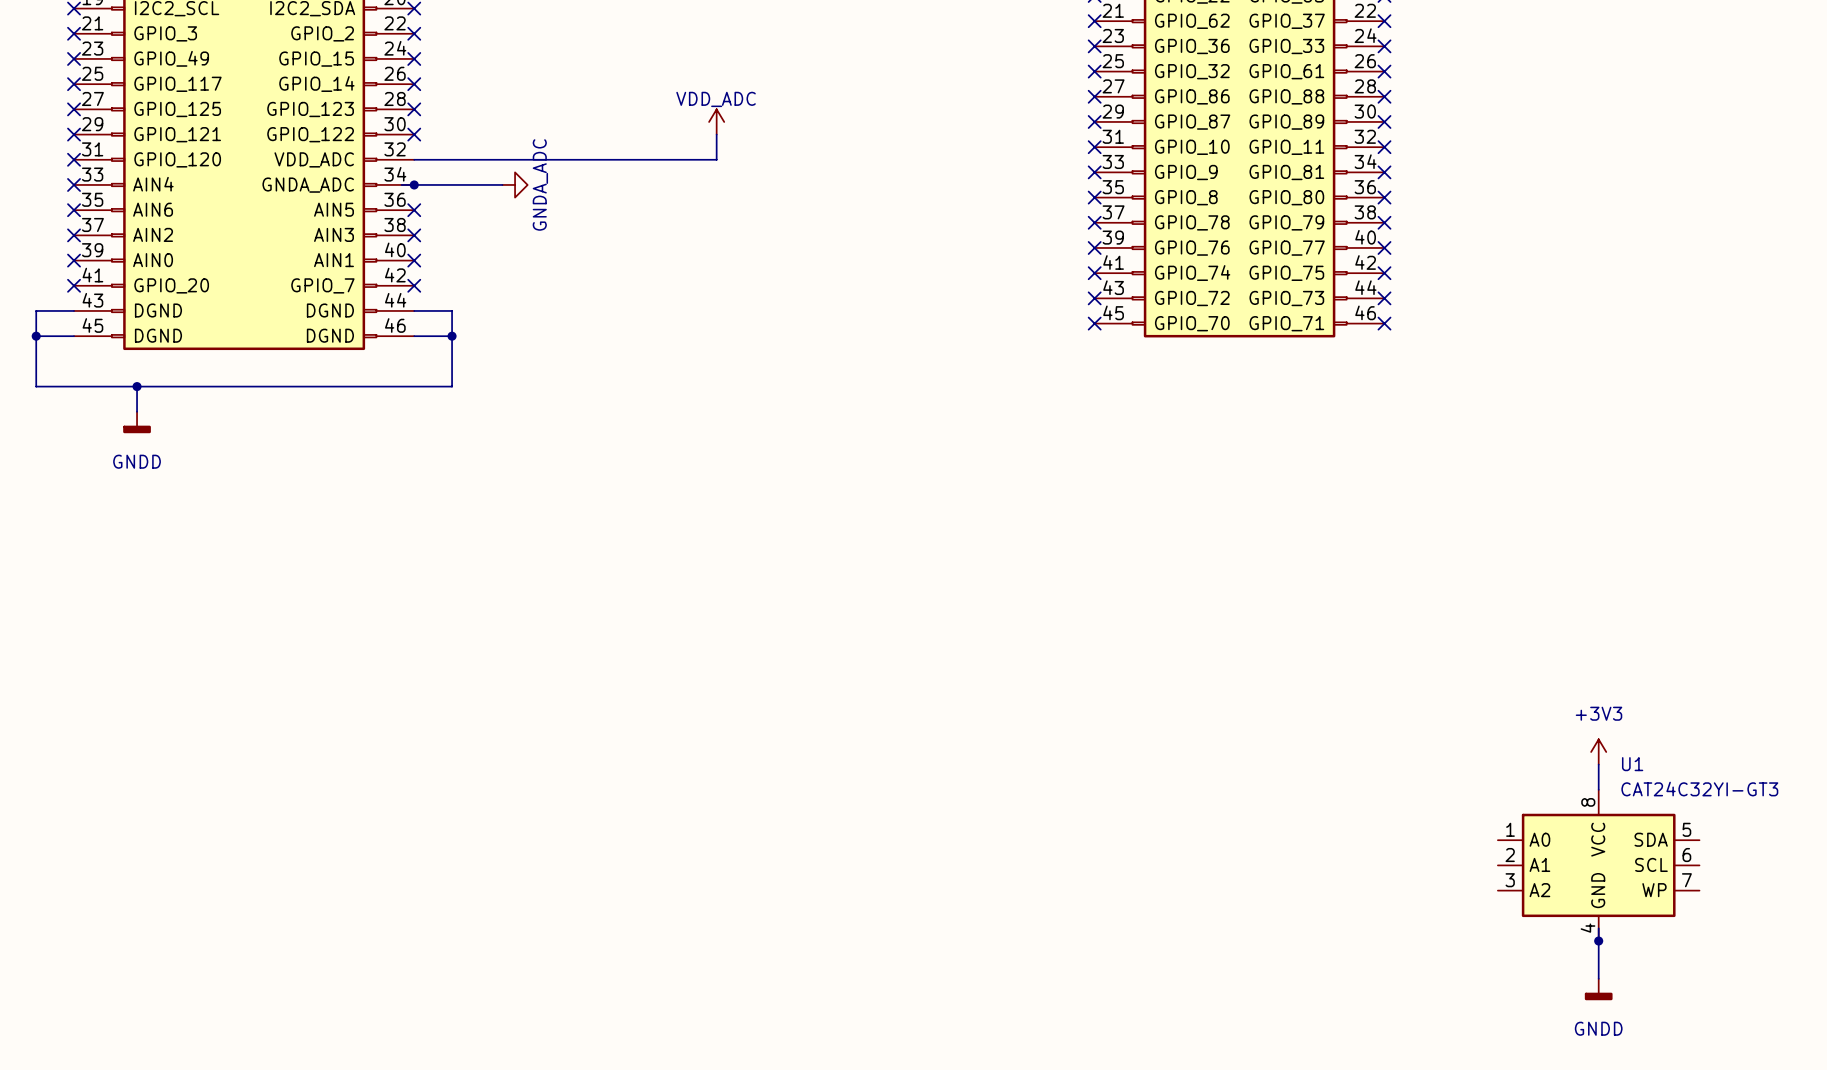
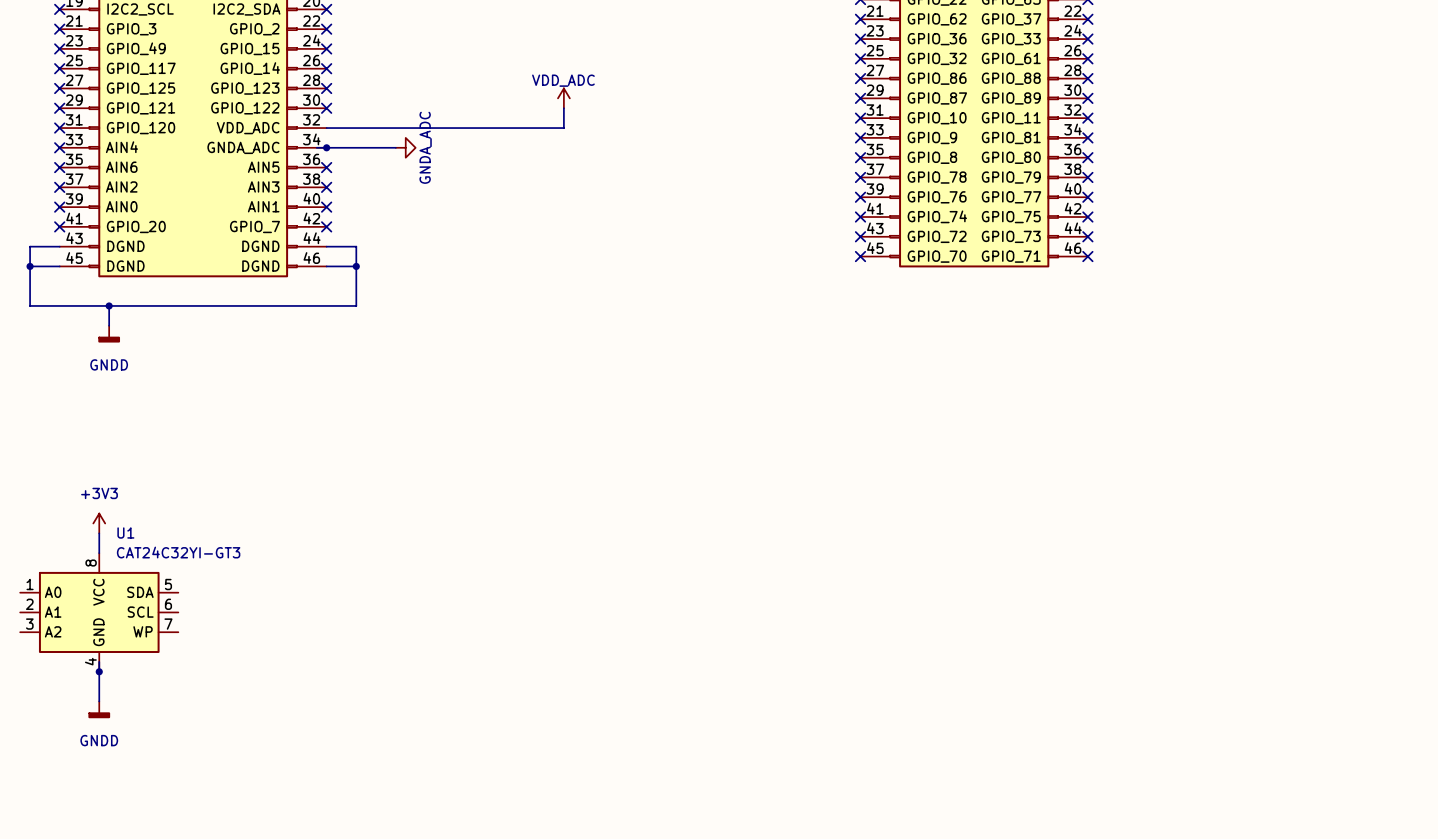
power symbol: none -> +3V3 (99, 523)
wire: none -> (99, 533) (99, 553)
power symbol: +3V3 (1598, 752) -> none
wire: (1598, 764) (1598, 789) -> none
wire: none -> (99, 661) (99, 701)
junction: none -> (99, 671)
U1 position: (1598, 865) -> (99, 612)
power symbol: none -> GNDD (99, 709)
wire: (1598, 928) (1598, 978) -> none
junction: (1598, 941) -> none
power symbol: GNDD (1598, 989) -> none

